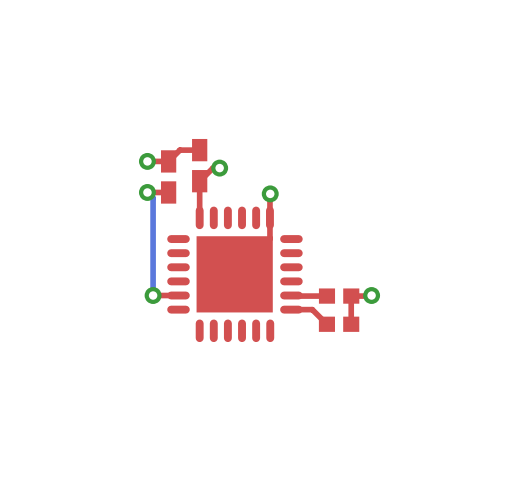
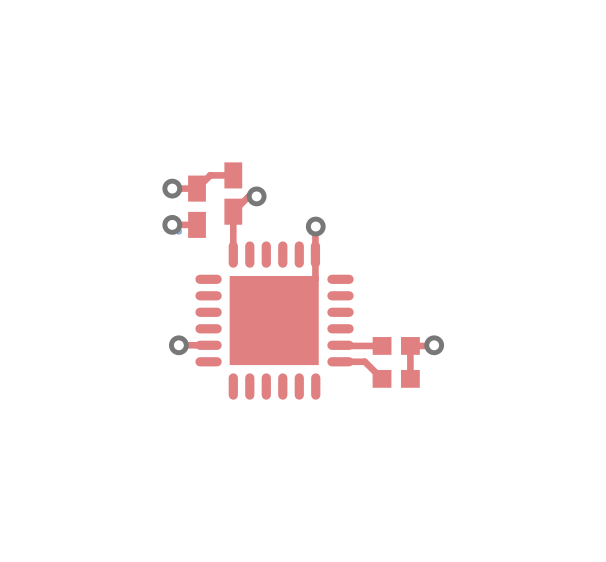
bottom track: (153, 198) (153, 295) -> none

